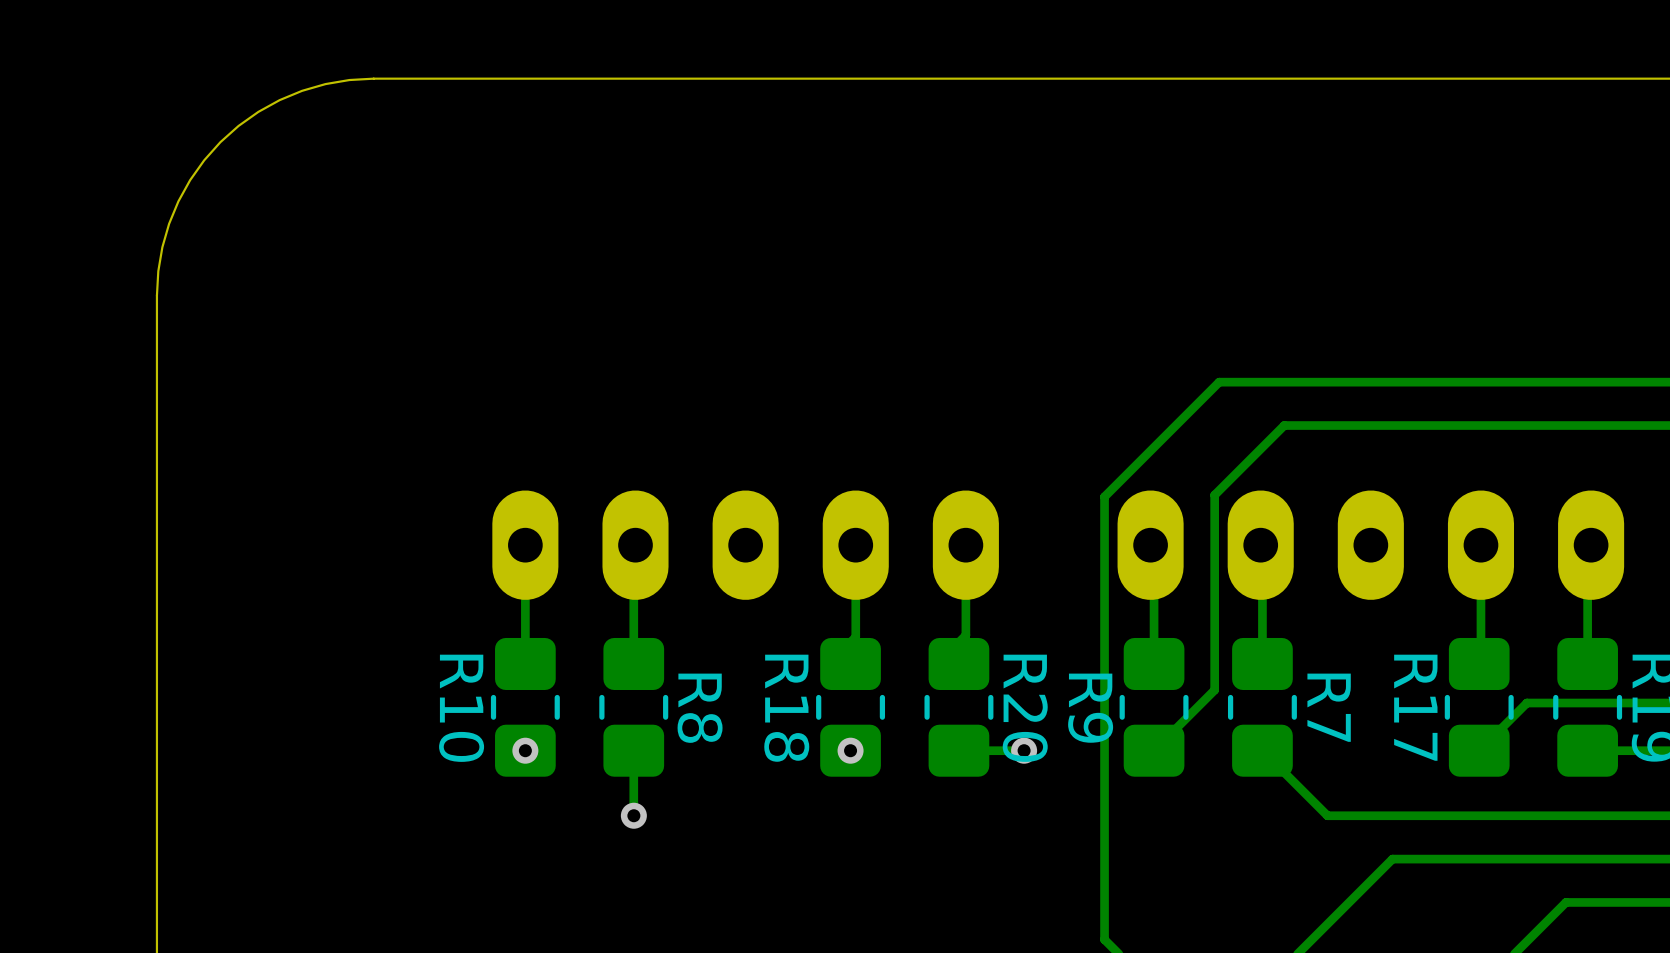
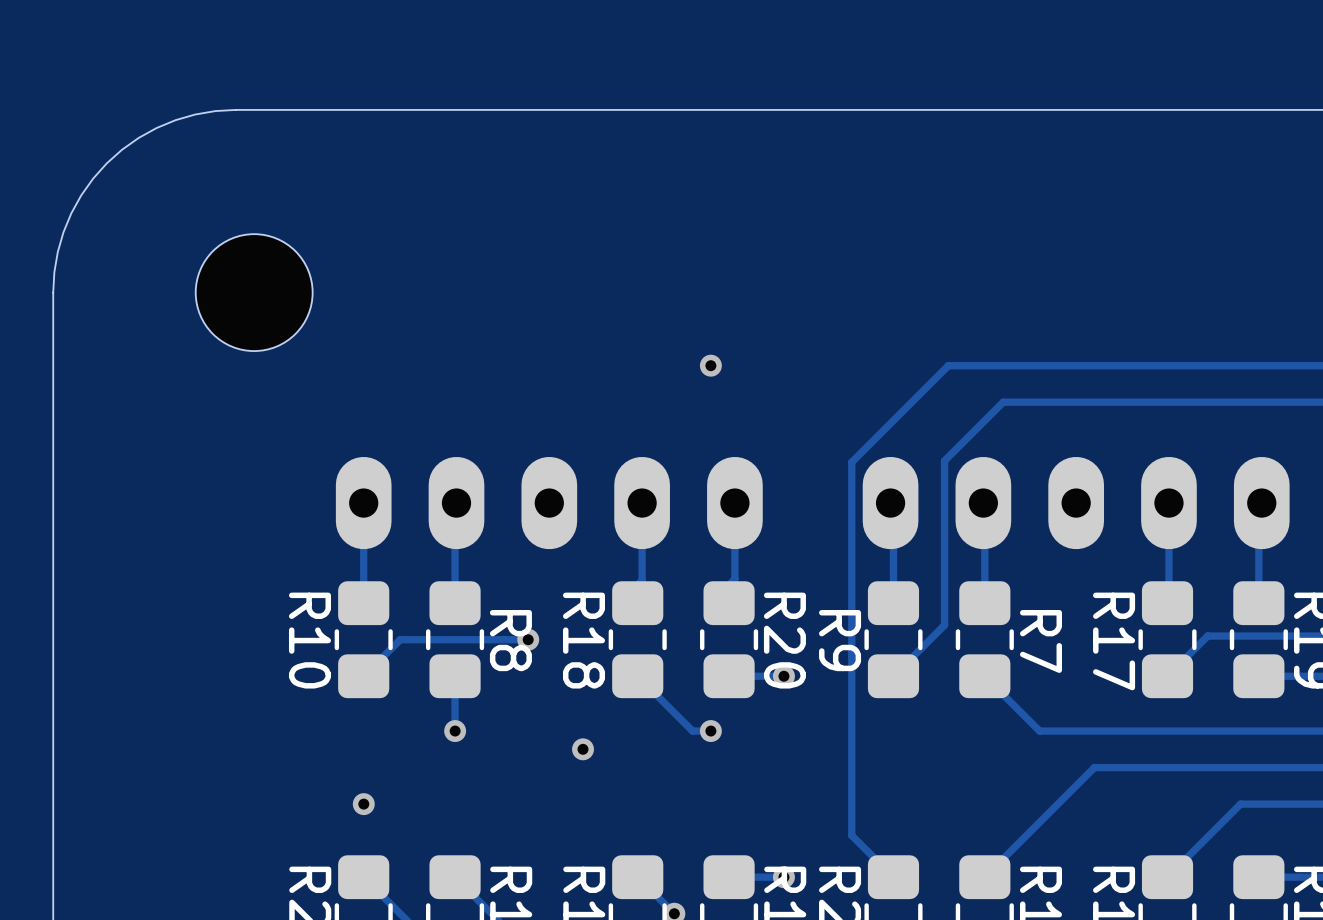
part: none -> (254, 292)
via: none -> (710, 365)
track: none -> (528, 639) (400, 639) (363, 676)
via: none -> (528, 639)
via: (525, 750) -> none
track: none -> (637, 676) (692, 731) (710, 731)
via: (850, 750) -> none
via: none -> (710, 731)
via: none -> (583, 749)
via: none -> (363, 804)

